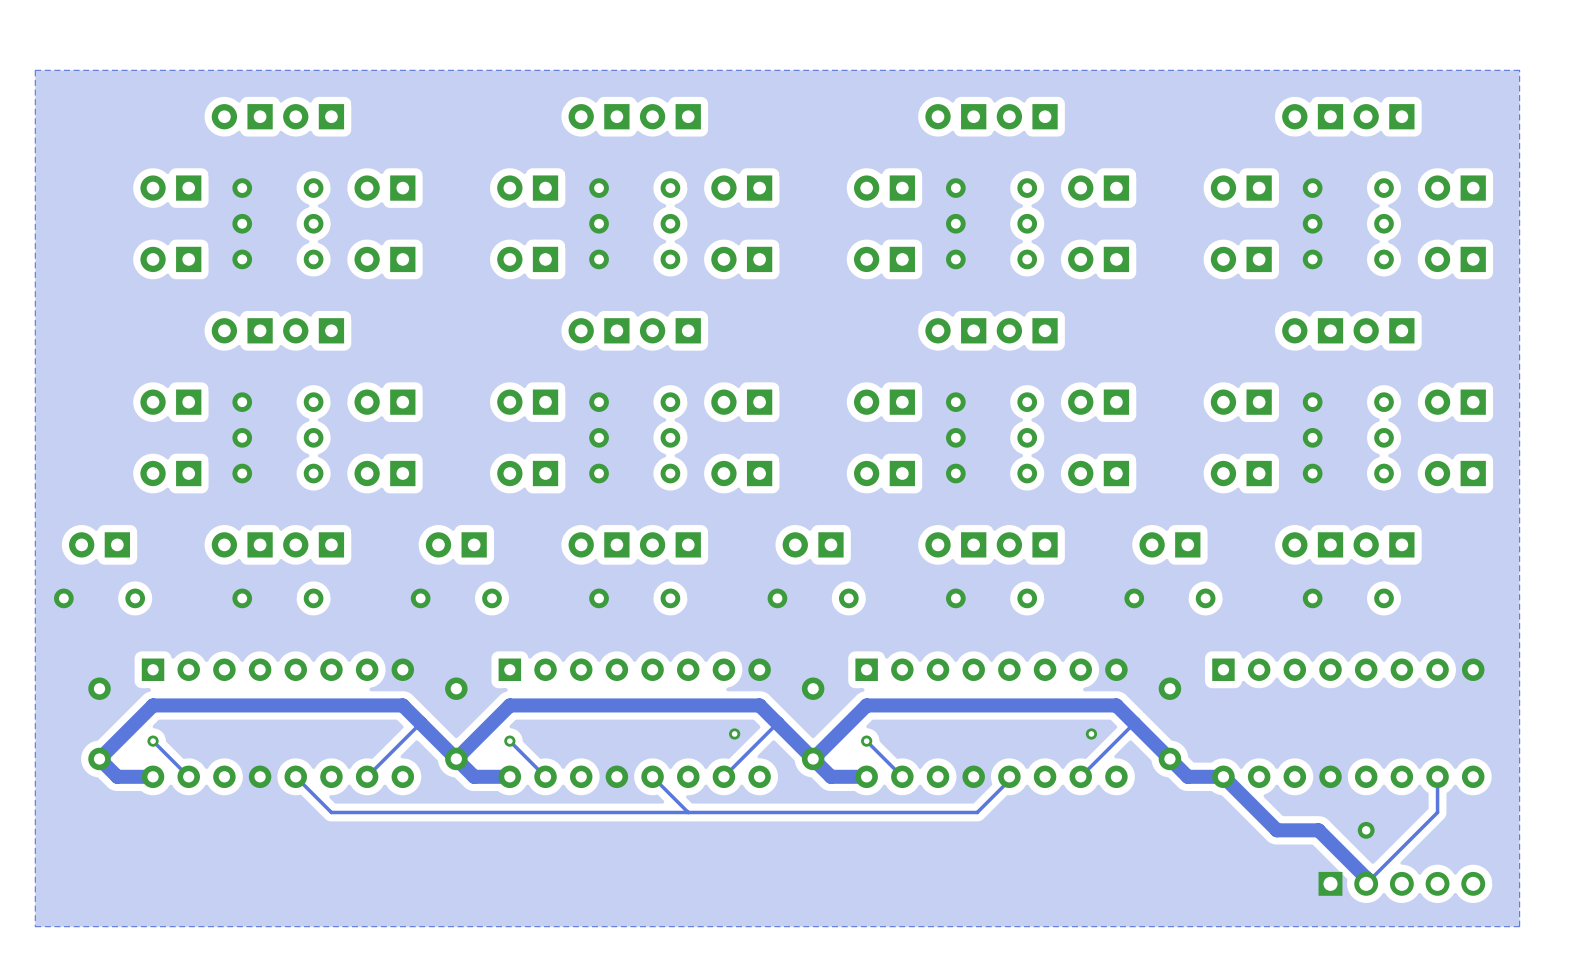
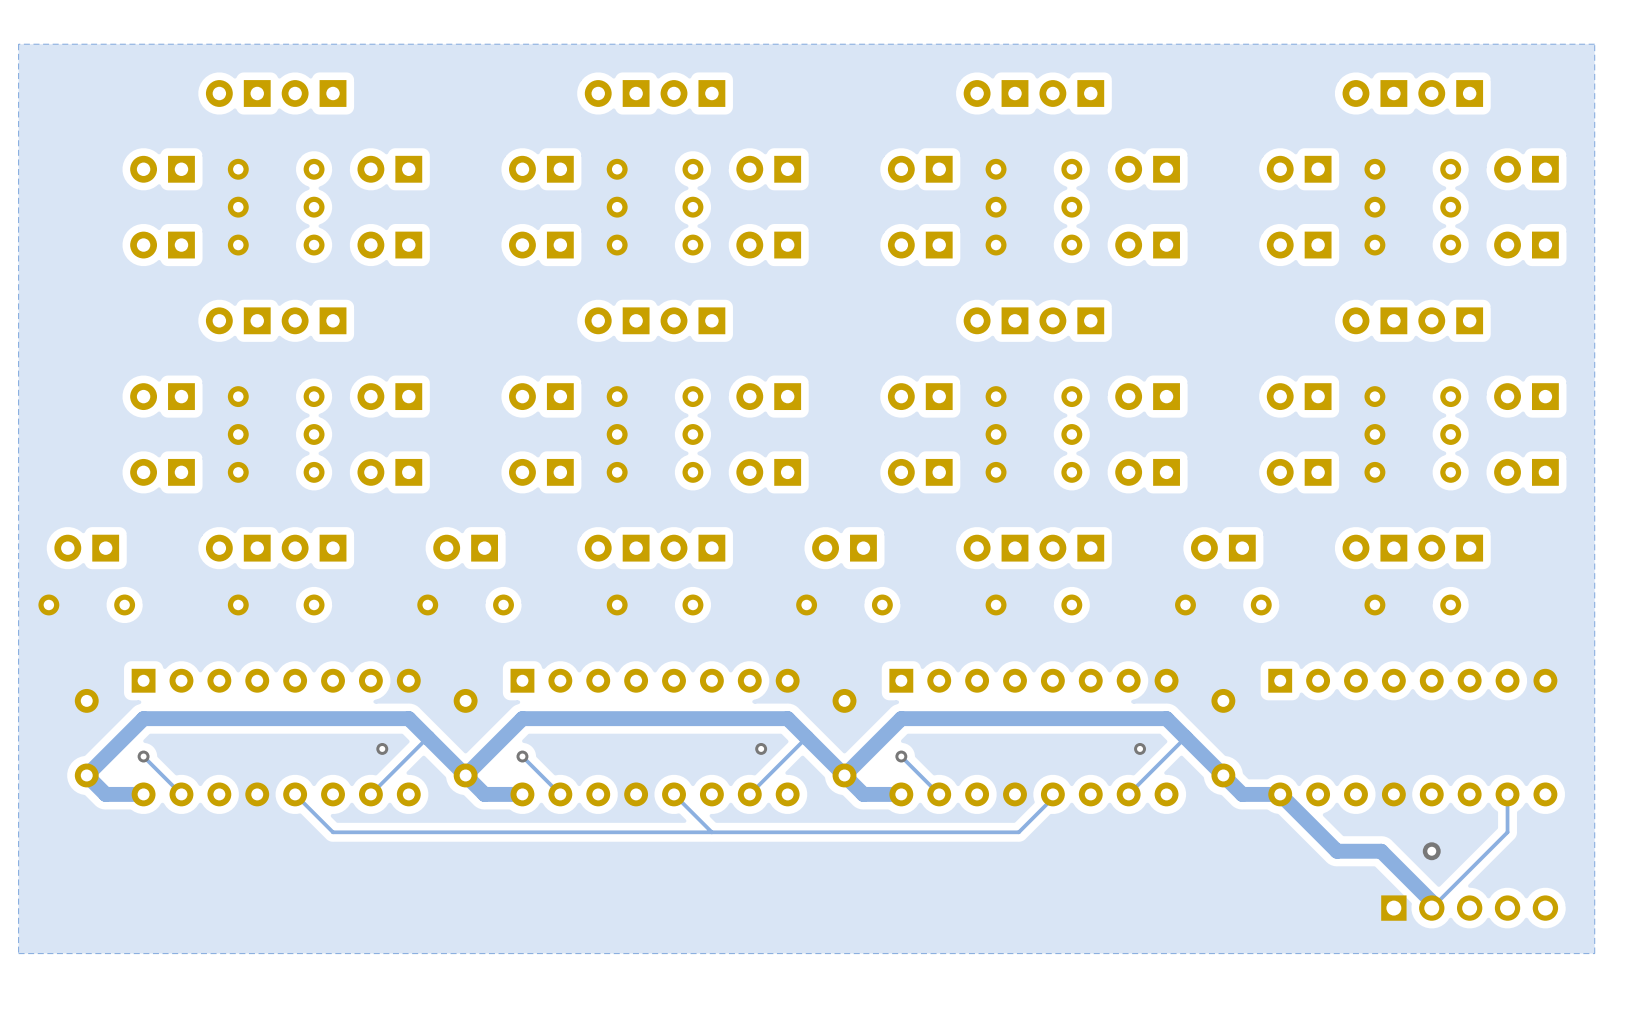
via: none -> (382, 748)

